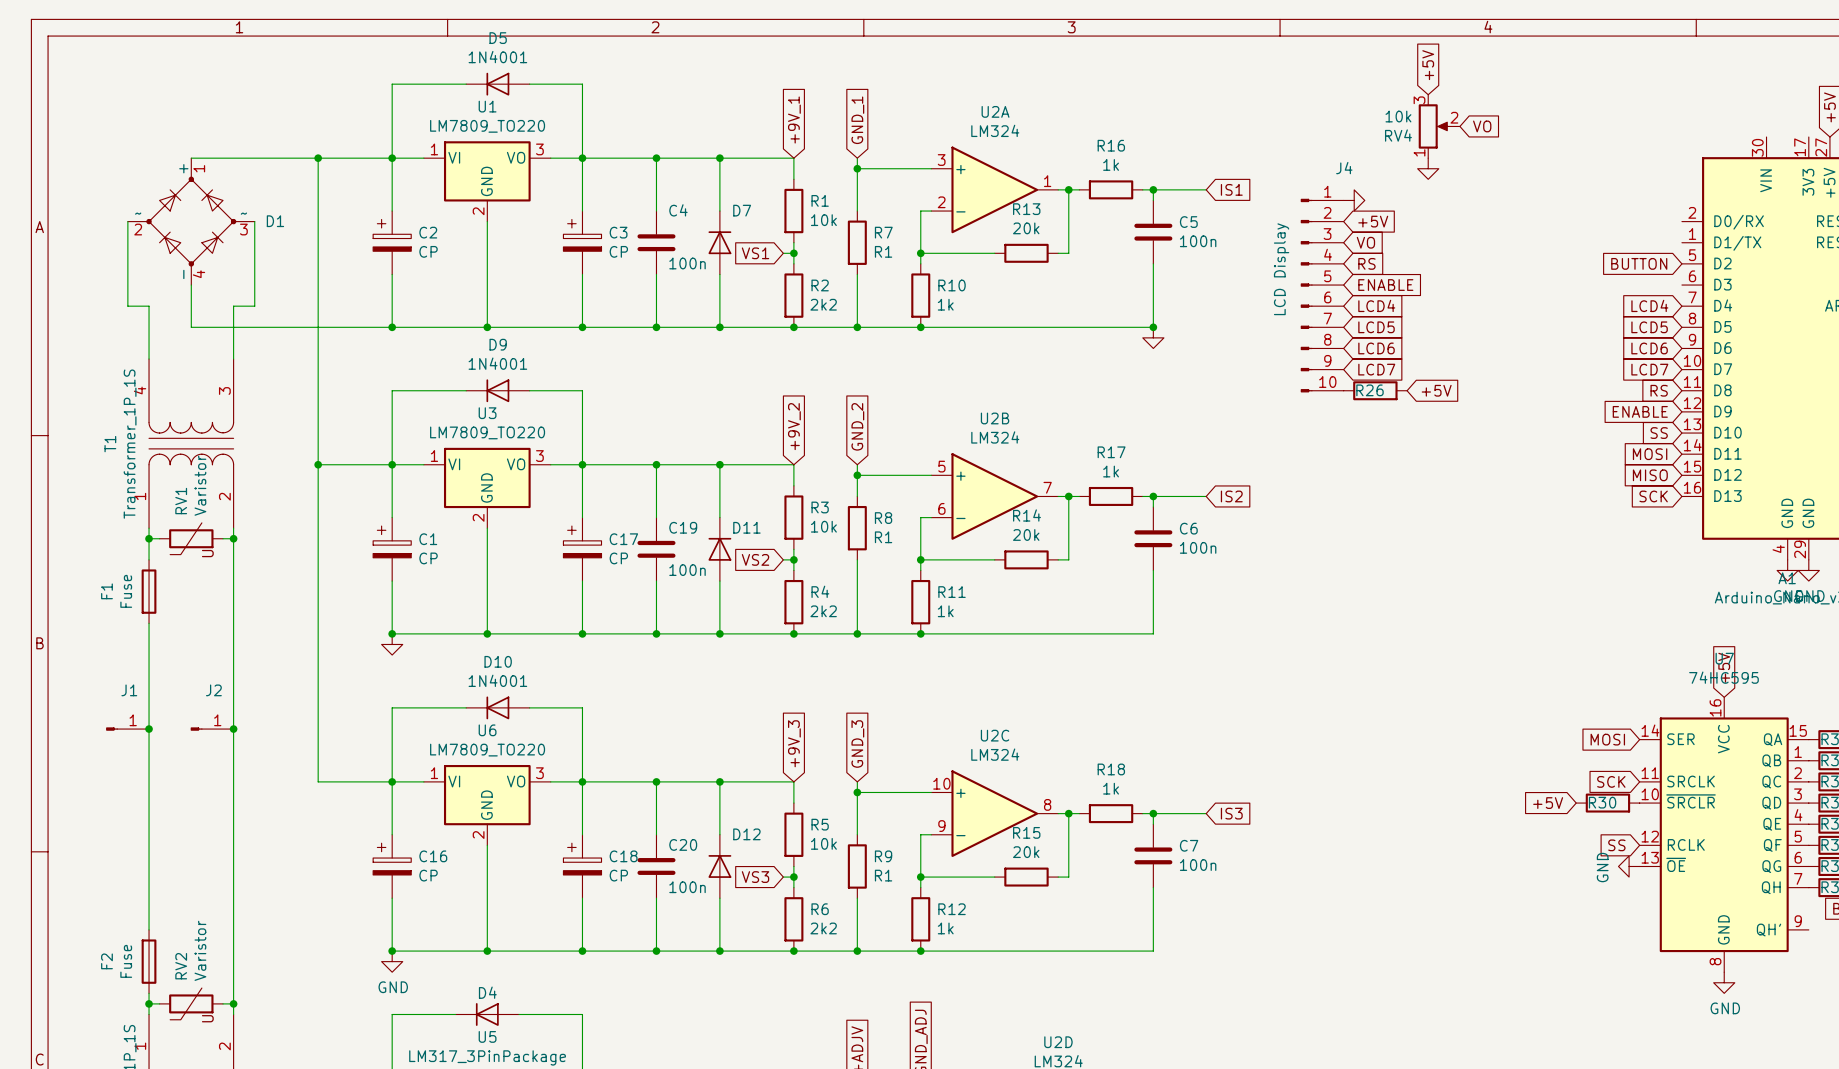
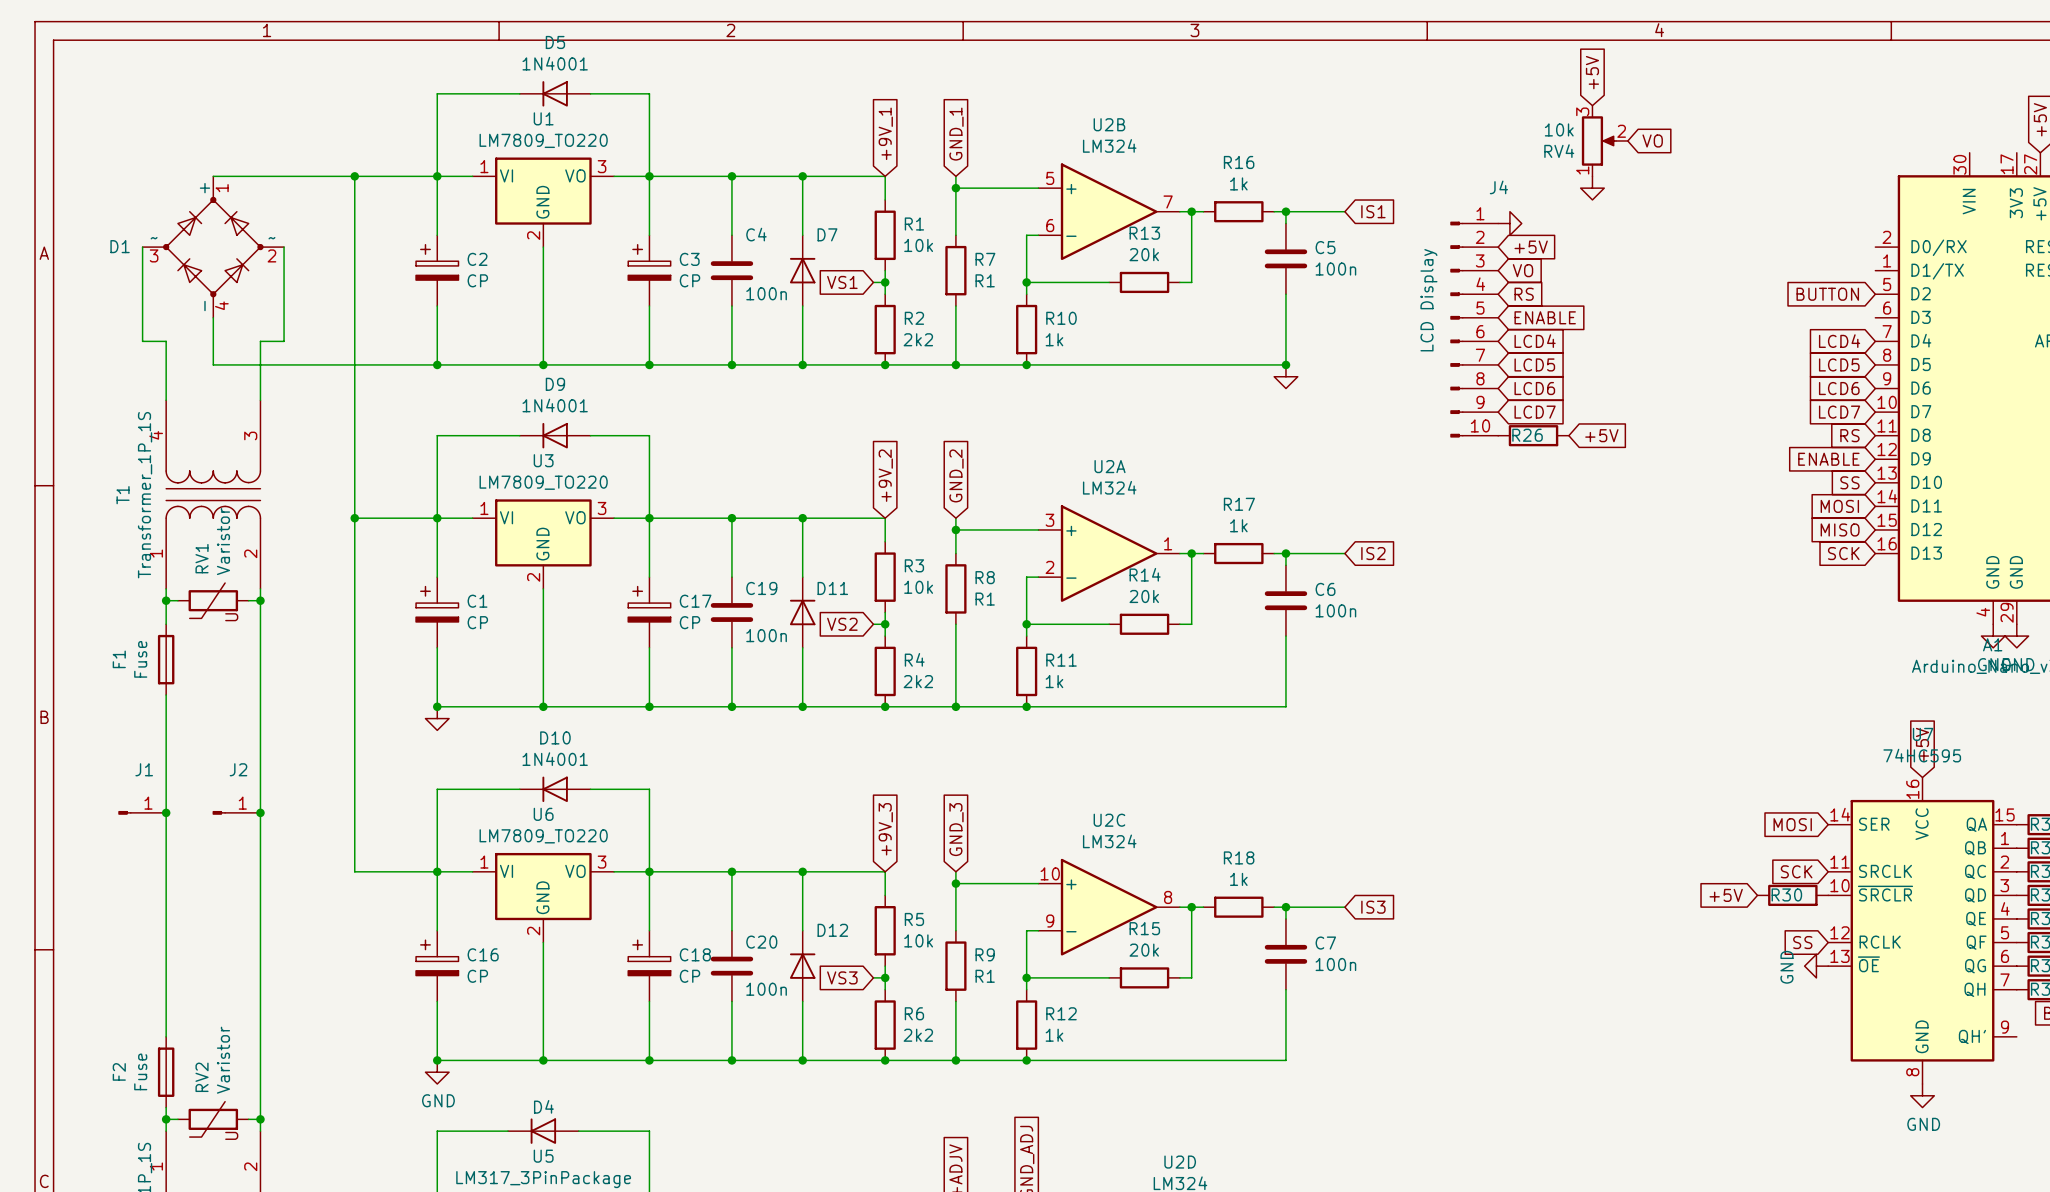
U2A position: (994, 189) -> (1109, 553)
D1 flip: as is (191, 221) -> left-right (213, 247)
U2B position: (994, 496) -> (1109, 211)

